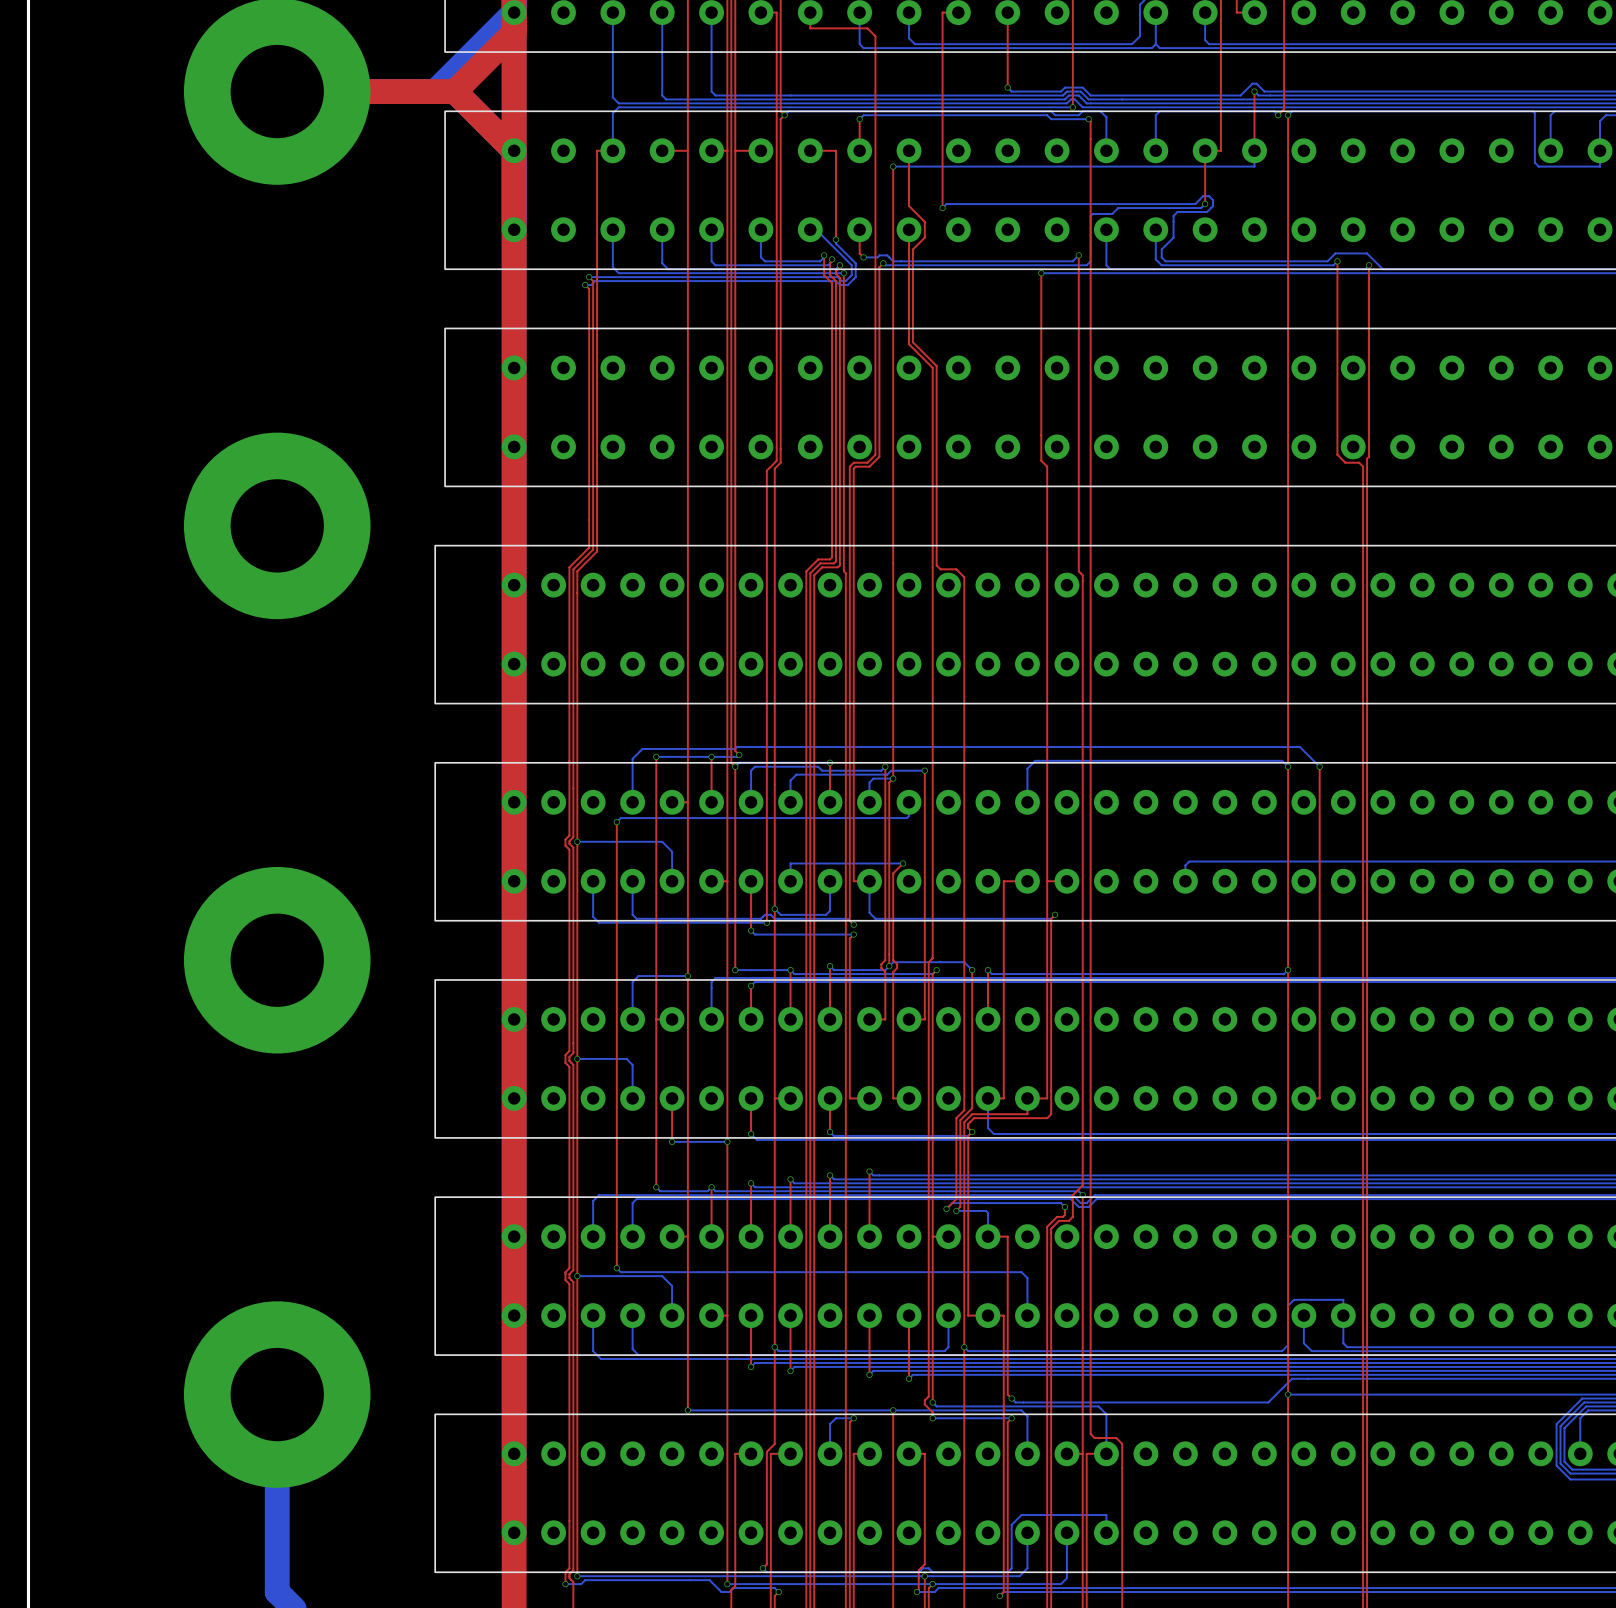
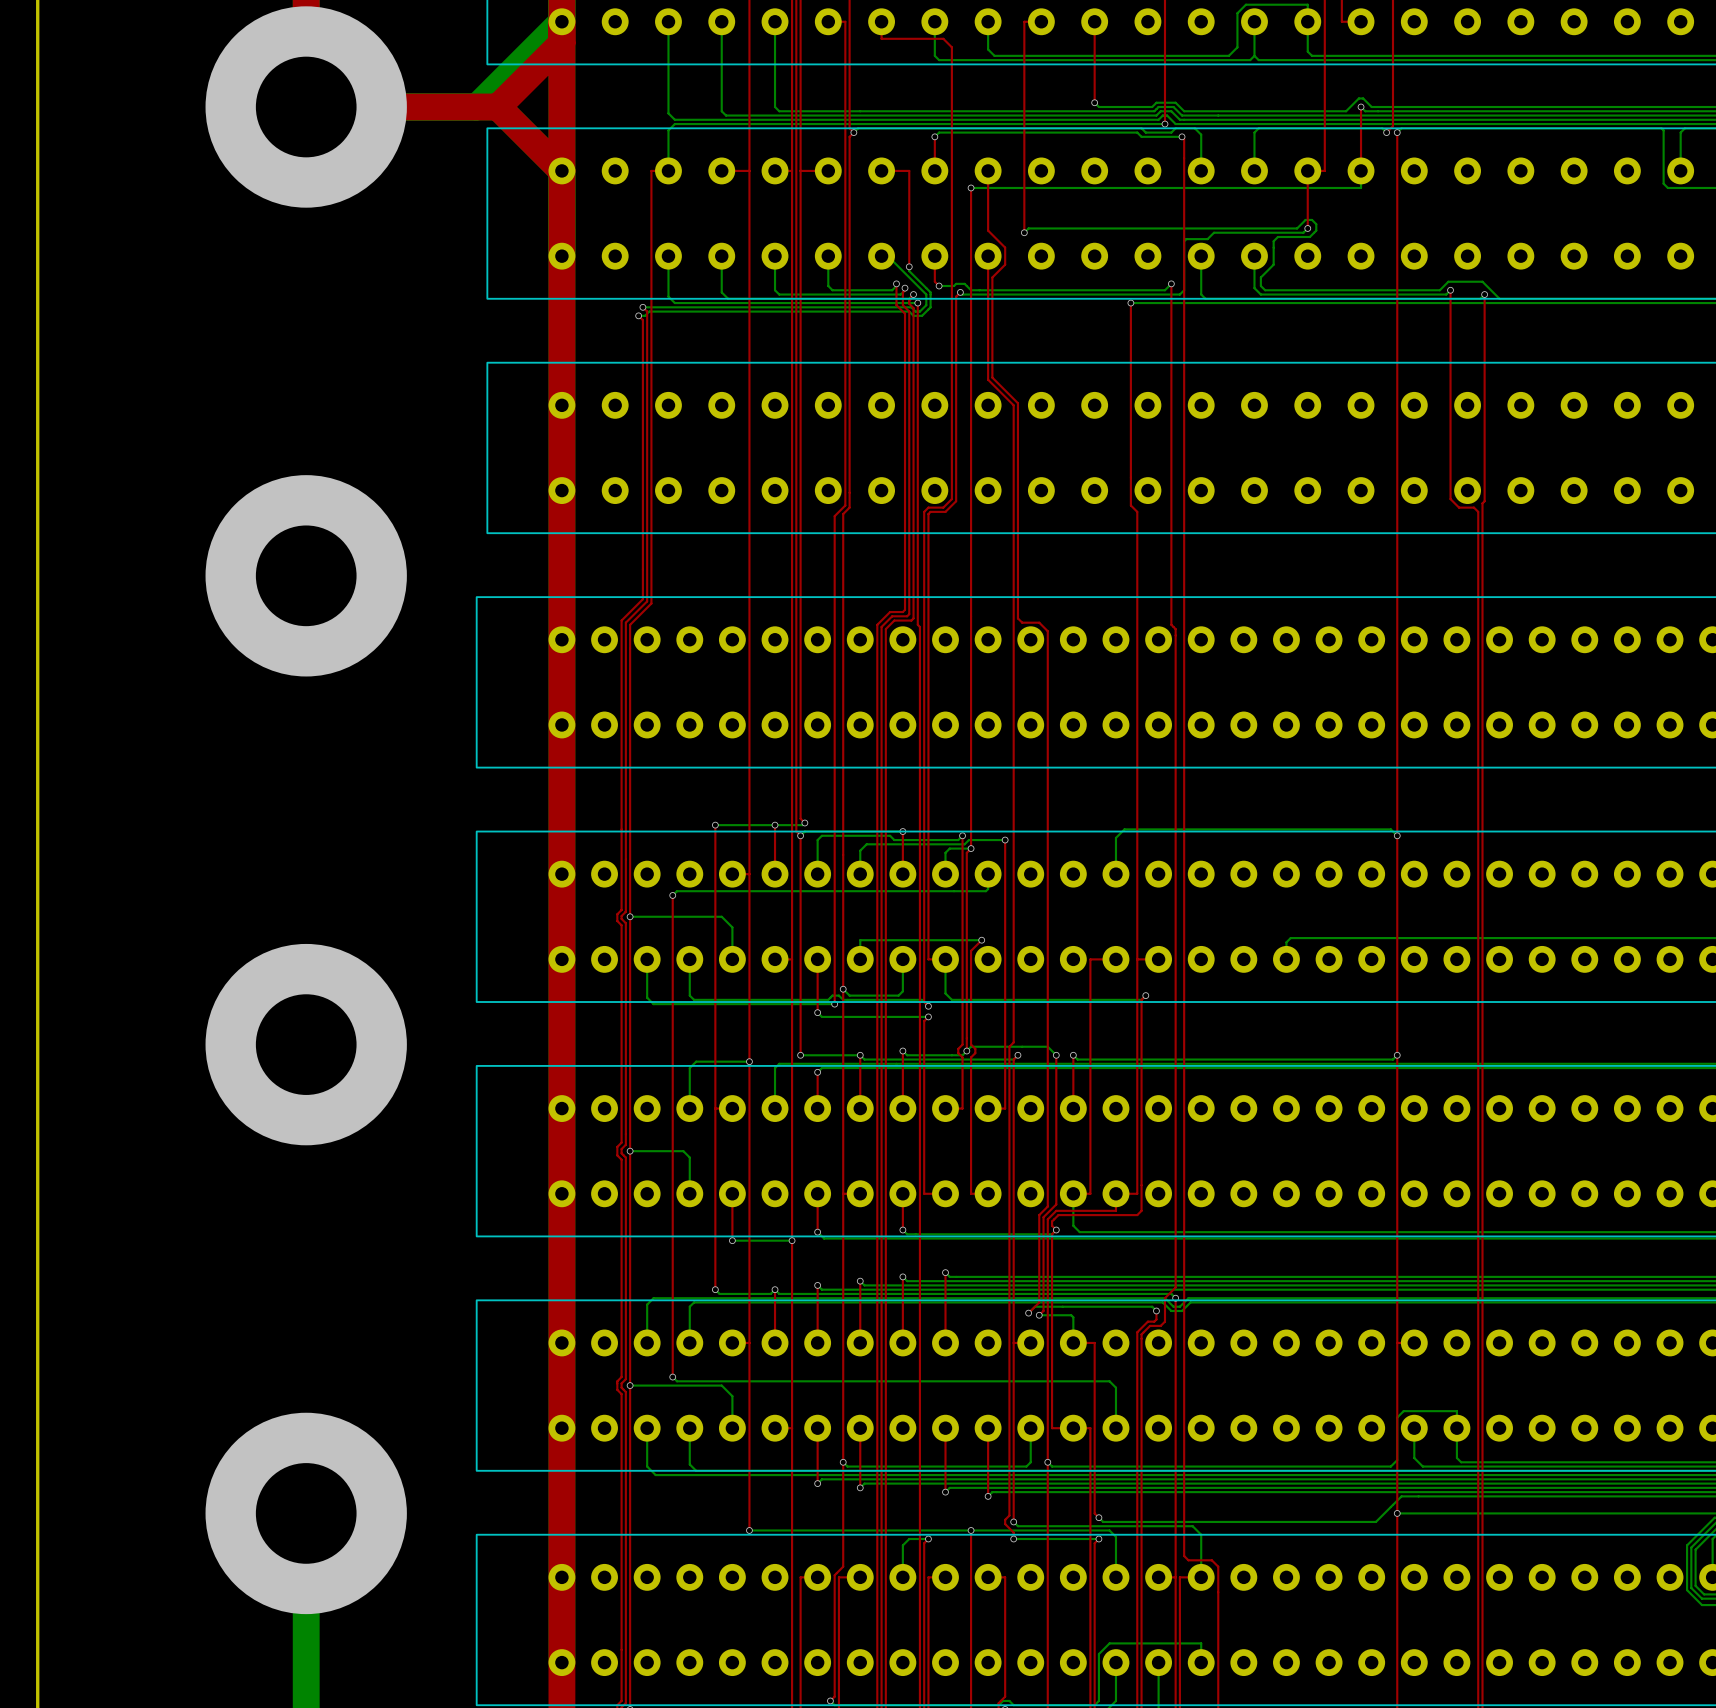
top track: (1319, 766) (1319, 1098) (1303, 1098) -> none
bottom track: (1319, 766) (1299, 747) (737, 747) (735, 748) (642, 748) (632, 758) (632, 802) -> none
via: (1319, 766) -> none

